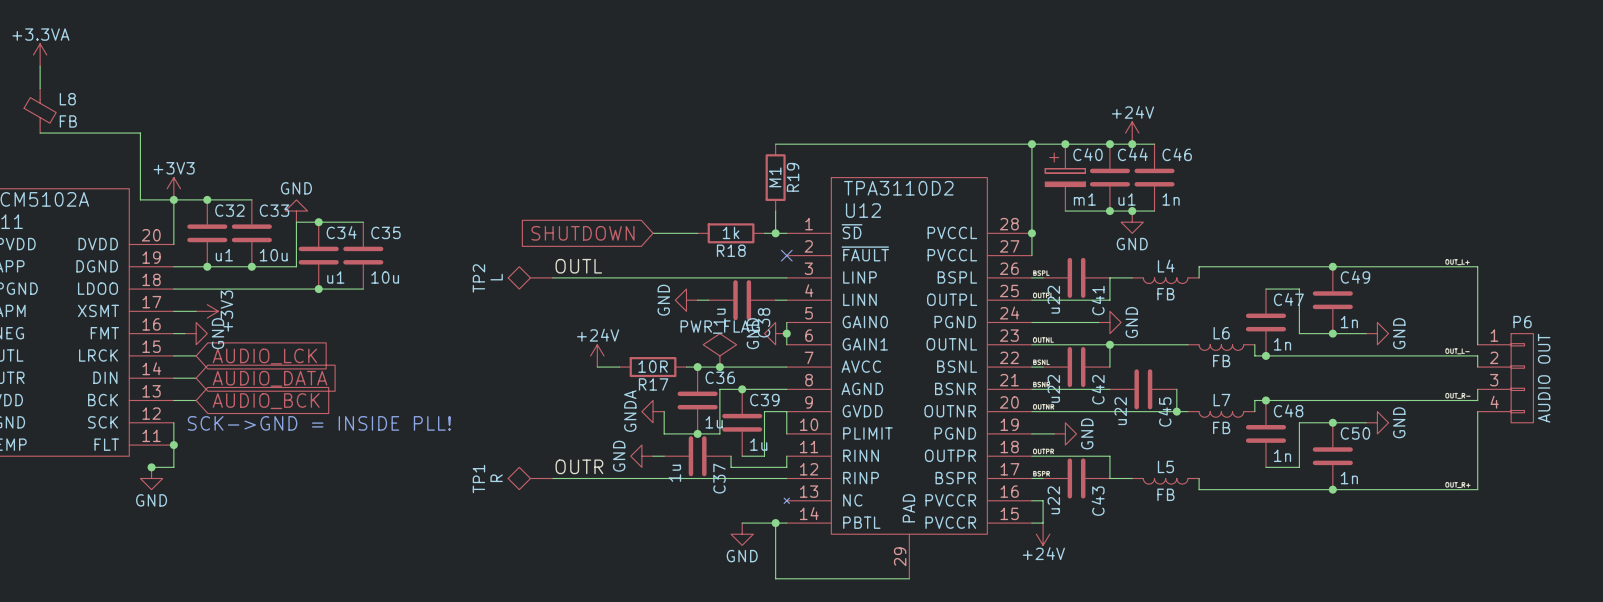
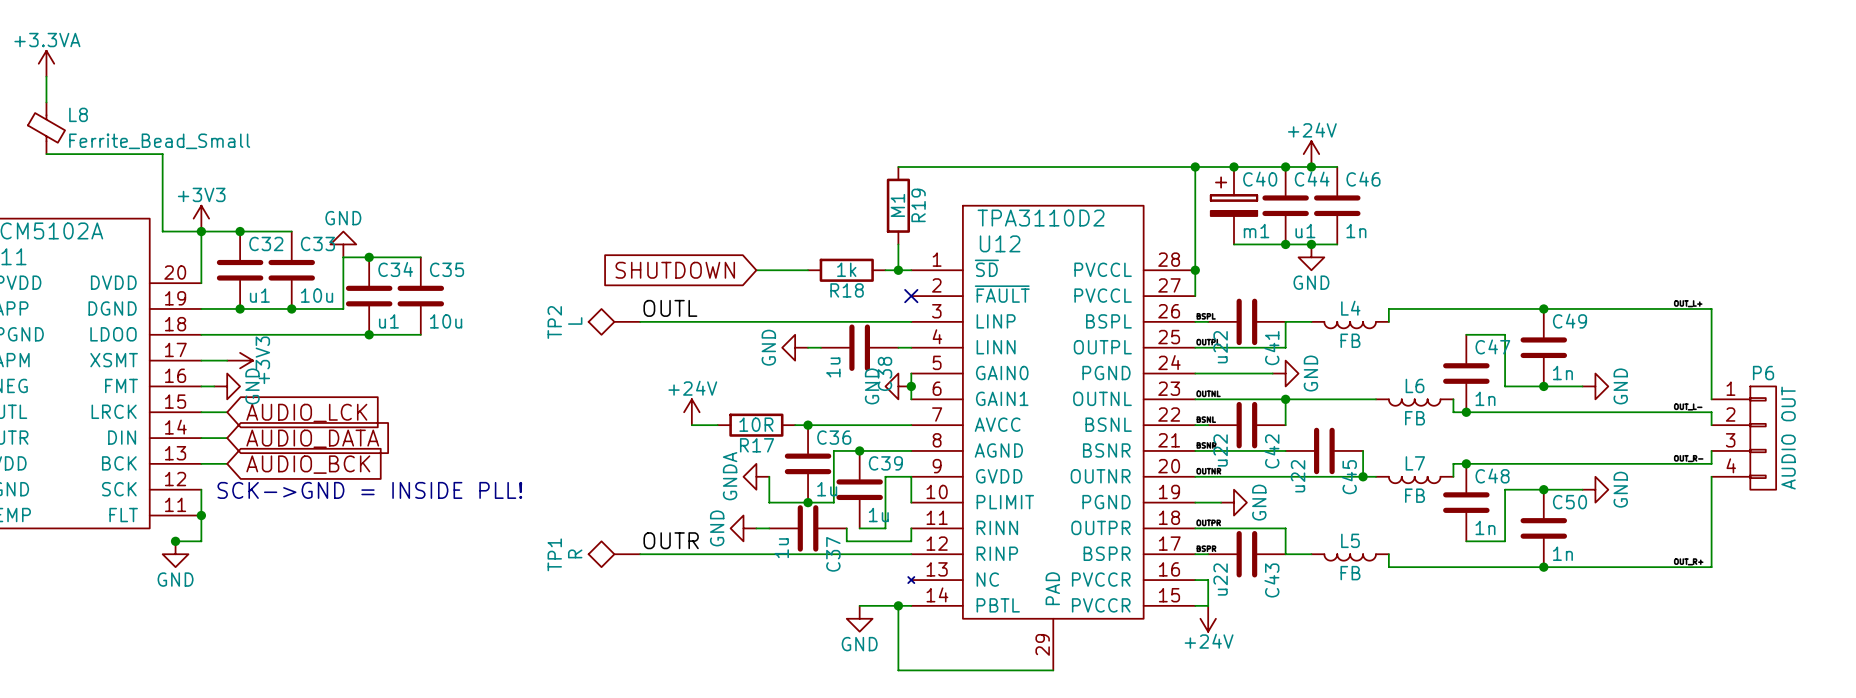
L8 value: FB (68, 121) -> Ferrite_Bead_Small (159, 141)
power symbol: PWR_FLAG (719, 350) -> none
junction: (719, 367) -> none

